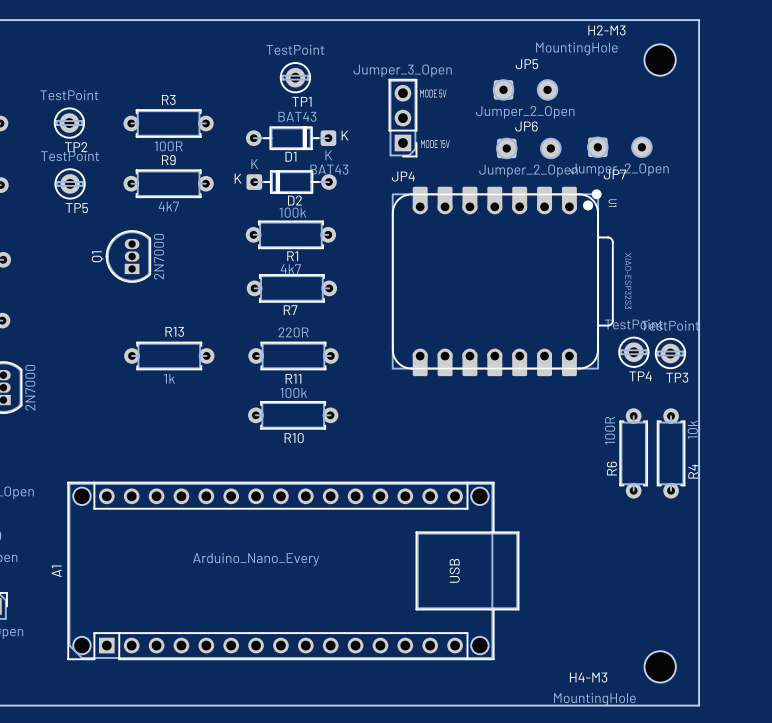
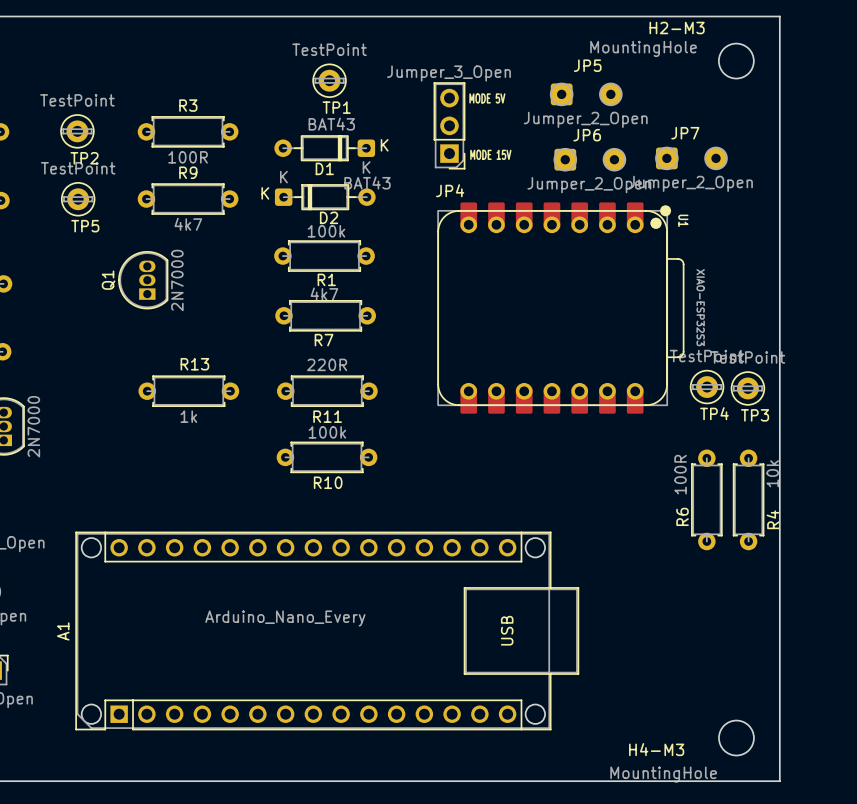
JP7 name position: JP7 (614, 174) -> JP7 (685, 133)

